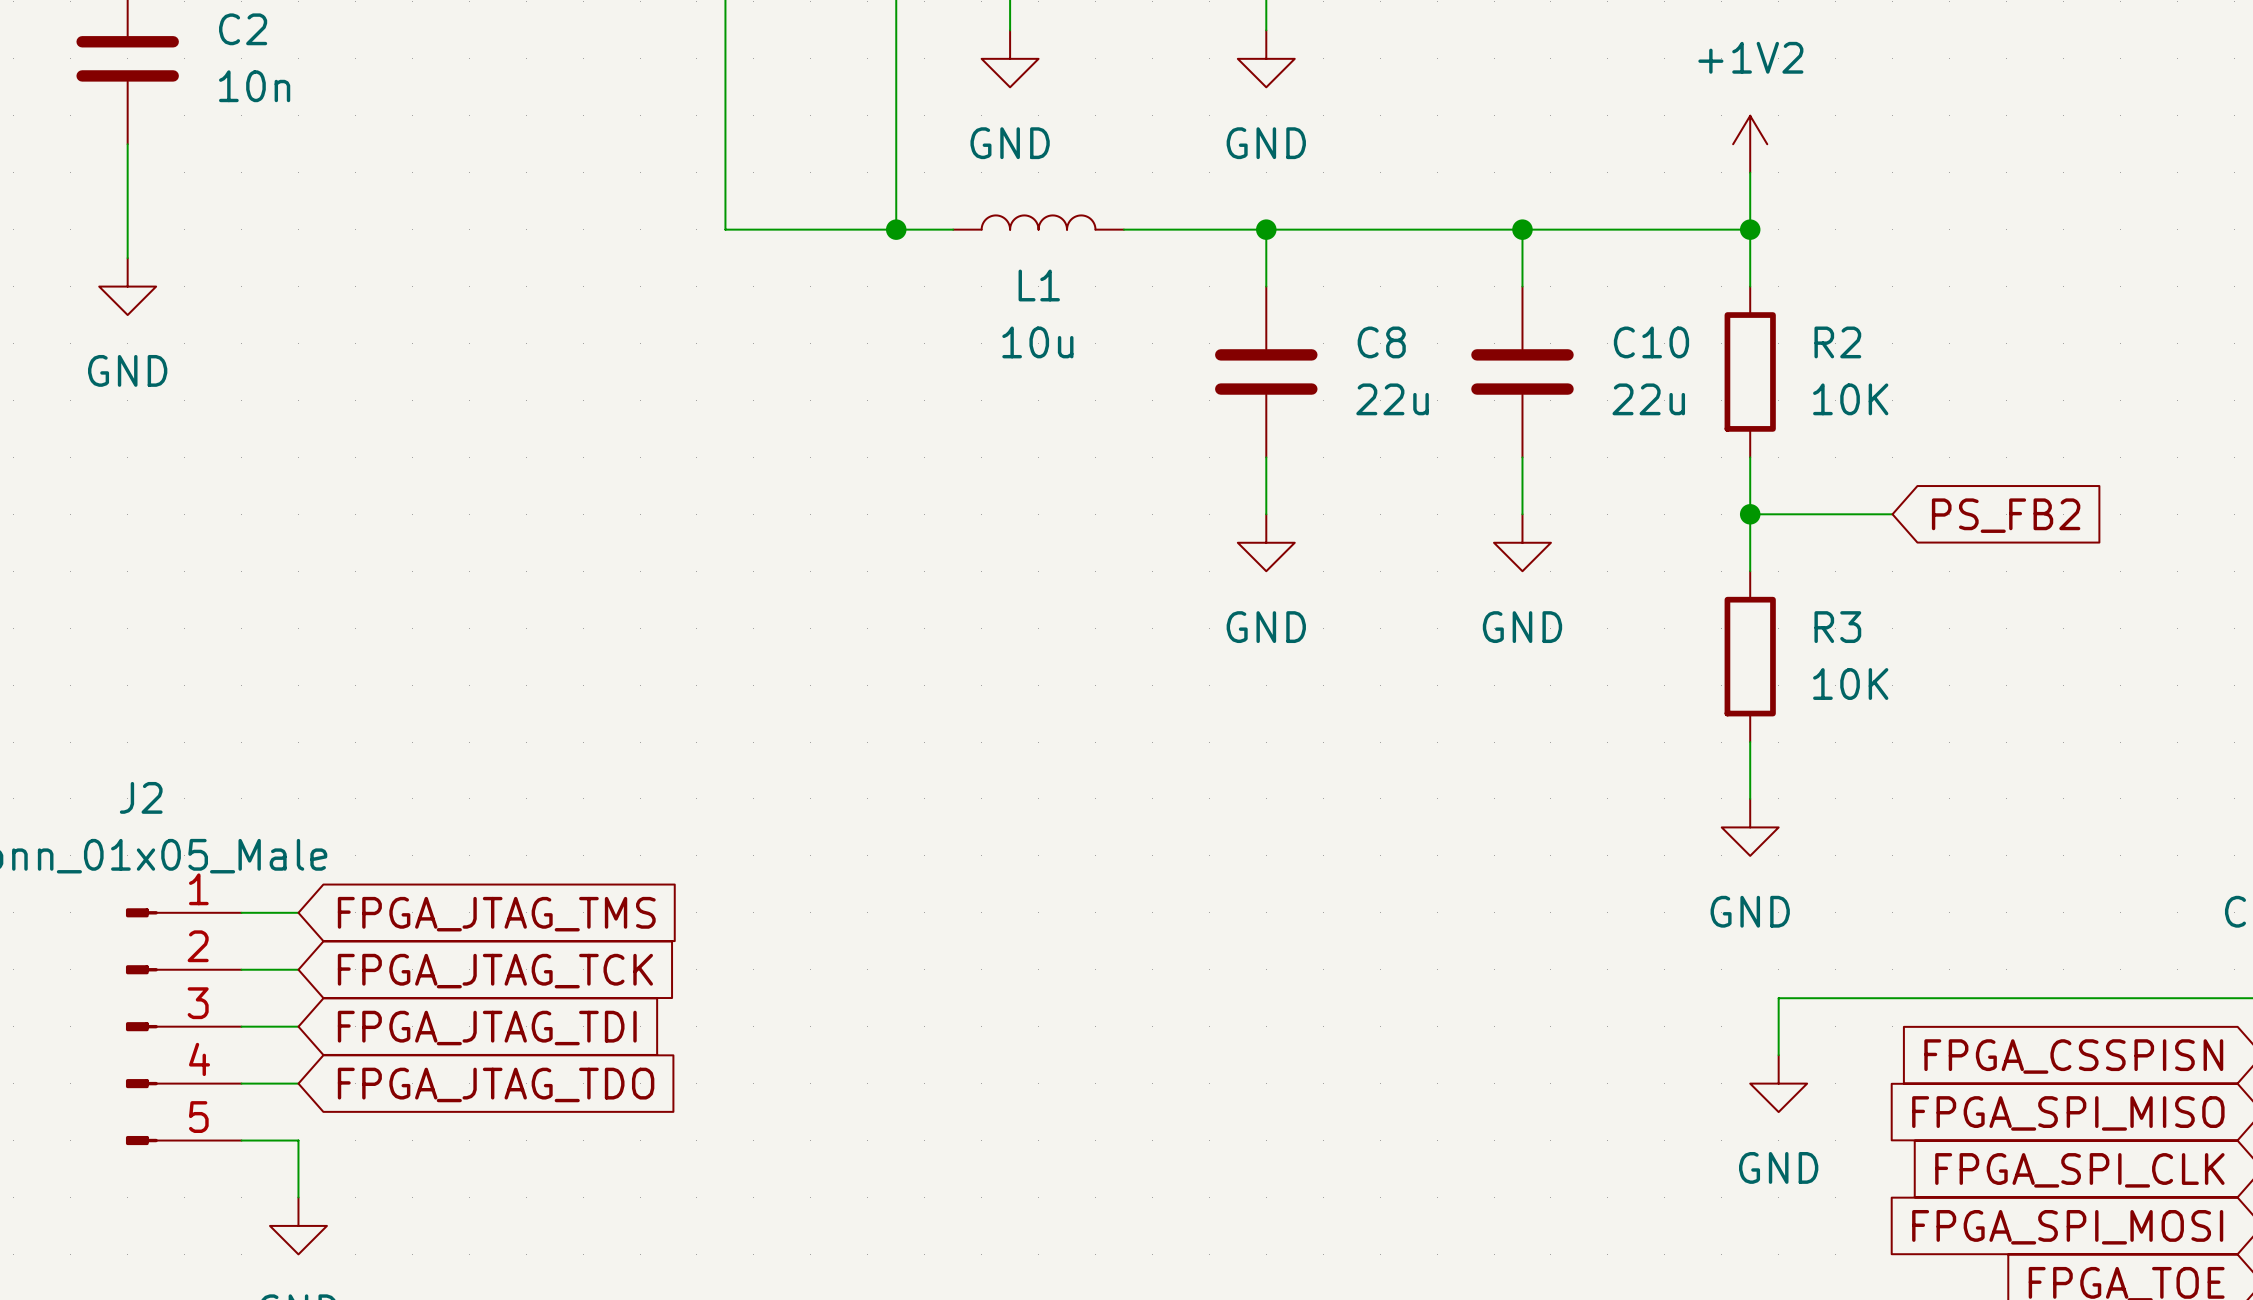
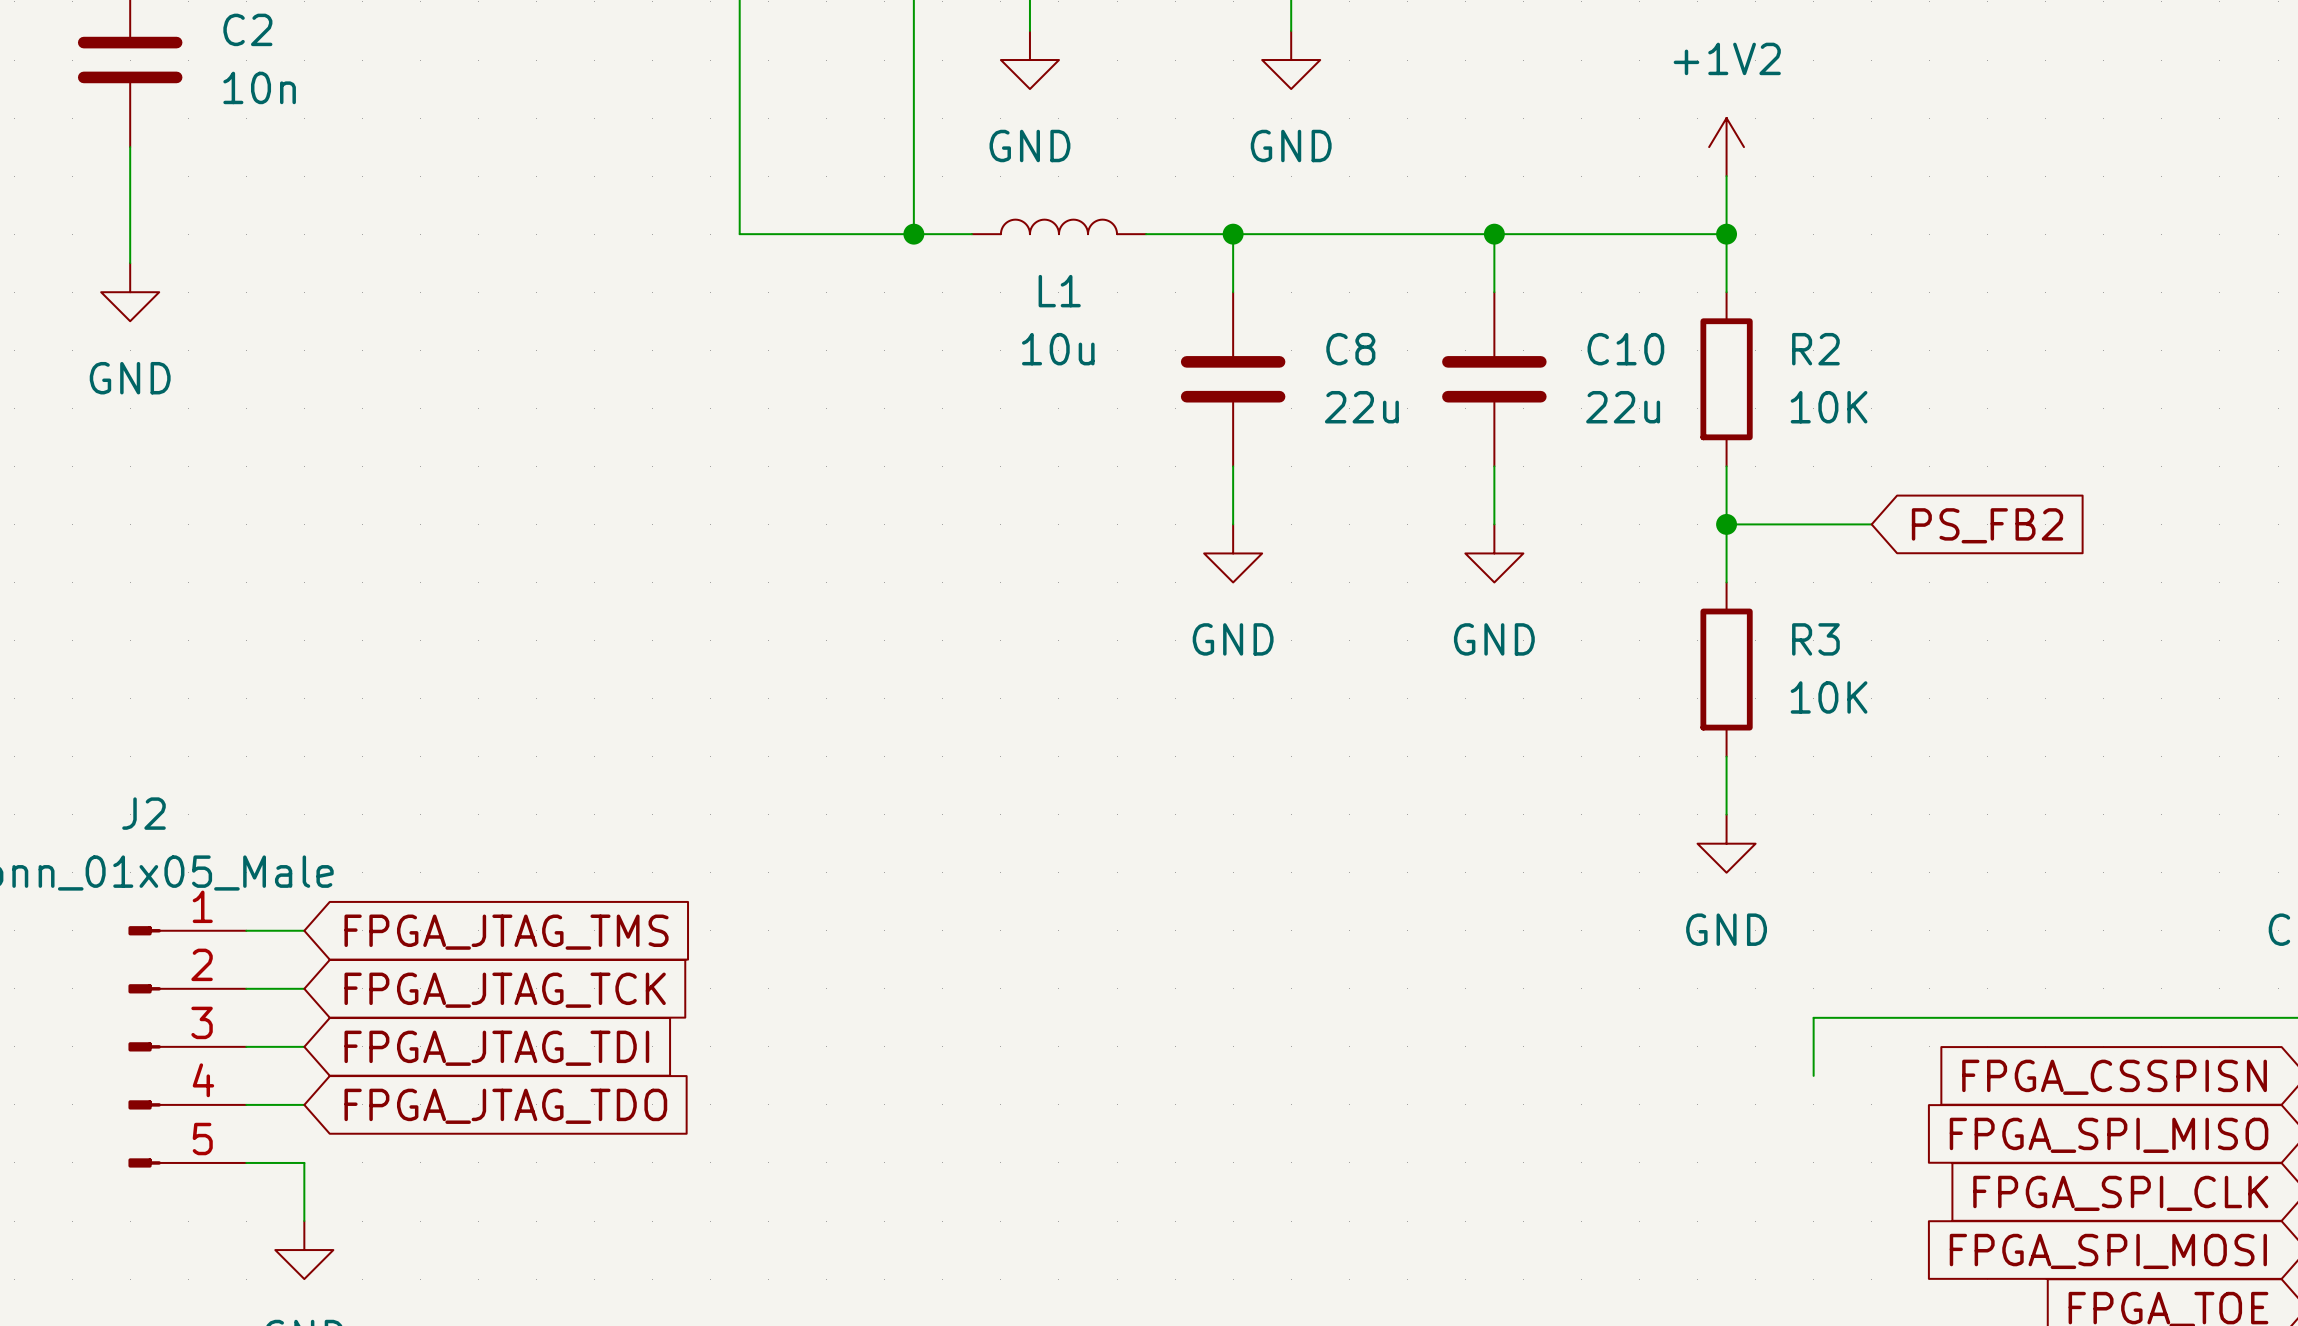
power symbol position: +1V2 (1750, 144) -> +1V2 (1726, 147)
wire: (1750, 172) (1750, 286) -> (1726, 176) (1726, 292)
wire: (1266, 229) (1266, 286) -> (1233, 234) (1233, 292)
junction position: (1266, 229) -> (1233, 234)
wire: (1522, 229) (1522, 286) -> (1494, 234) (1494, 292)
junction position: (1522, 229) -> (1494, 234)
wire: (1693, 229) (1750, 229) -> none
junction position: (1750, 229) -> (1726, 234)
C8 position: (1266, 371) -> (1233, 379)
C10 position: (1522, 371) -> (1494, 379)
R2 position: (1750, 371) -> (1726, 379)
wire: (1266, 457) (1266, 514) -> (1233, 466) (1233, 524)
wire: (1522, 457) (1522, 514) -> (1494, 466) (1494, 524)
wire: (1750, 457) (1750, 571) -> (1726, 466) (1726, 582)
junction position: (1750, 514) -> (1726, 524)
wire: (1835, 514) (1892, 514) -> (1726, 524) (1784, 524)
global label position: PS_FB2 (2006, 515) -> PS_FB2 (1987, 525)
power symbol position: GND (1266, 542) -> GND (1233, 553)
power symbol position: GND (1522, 542) -> GND (1494, 553)
R3 position: (1750, 656) -> (1726, 669)
wire: (1750, 742) (1750, 798) -> (1726, 756) (1726, 814)
power symbol position: GND (1750, 827) -> GND (1726, 843)
power symbol: GND (1778, 1083) -> none

